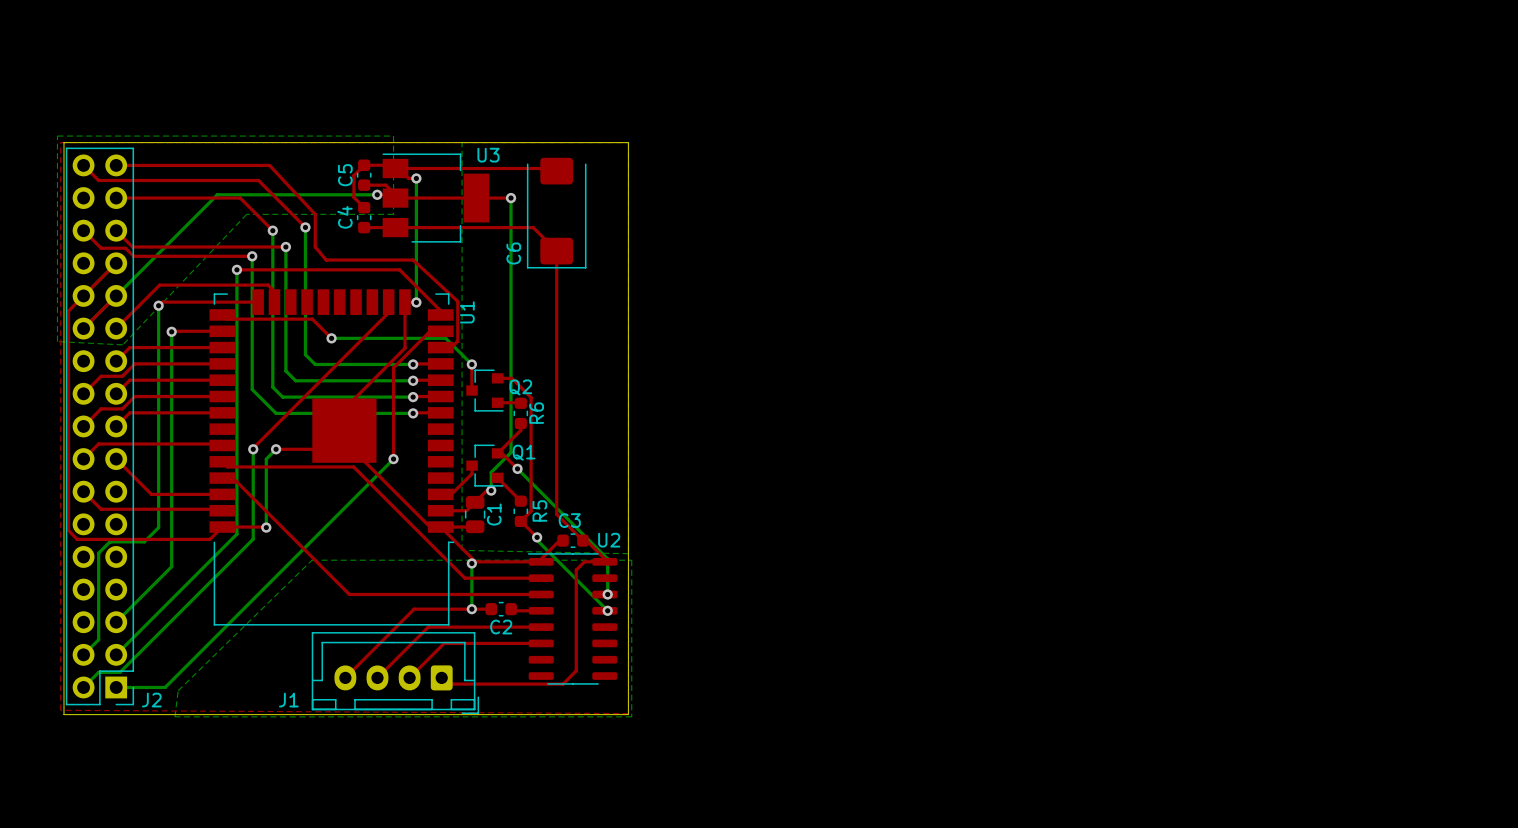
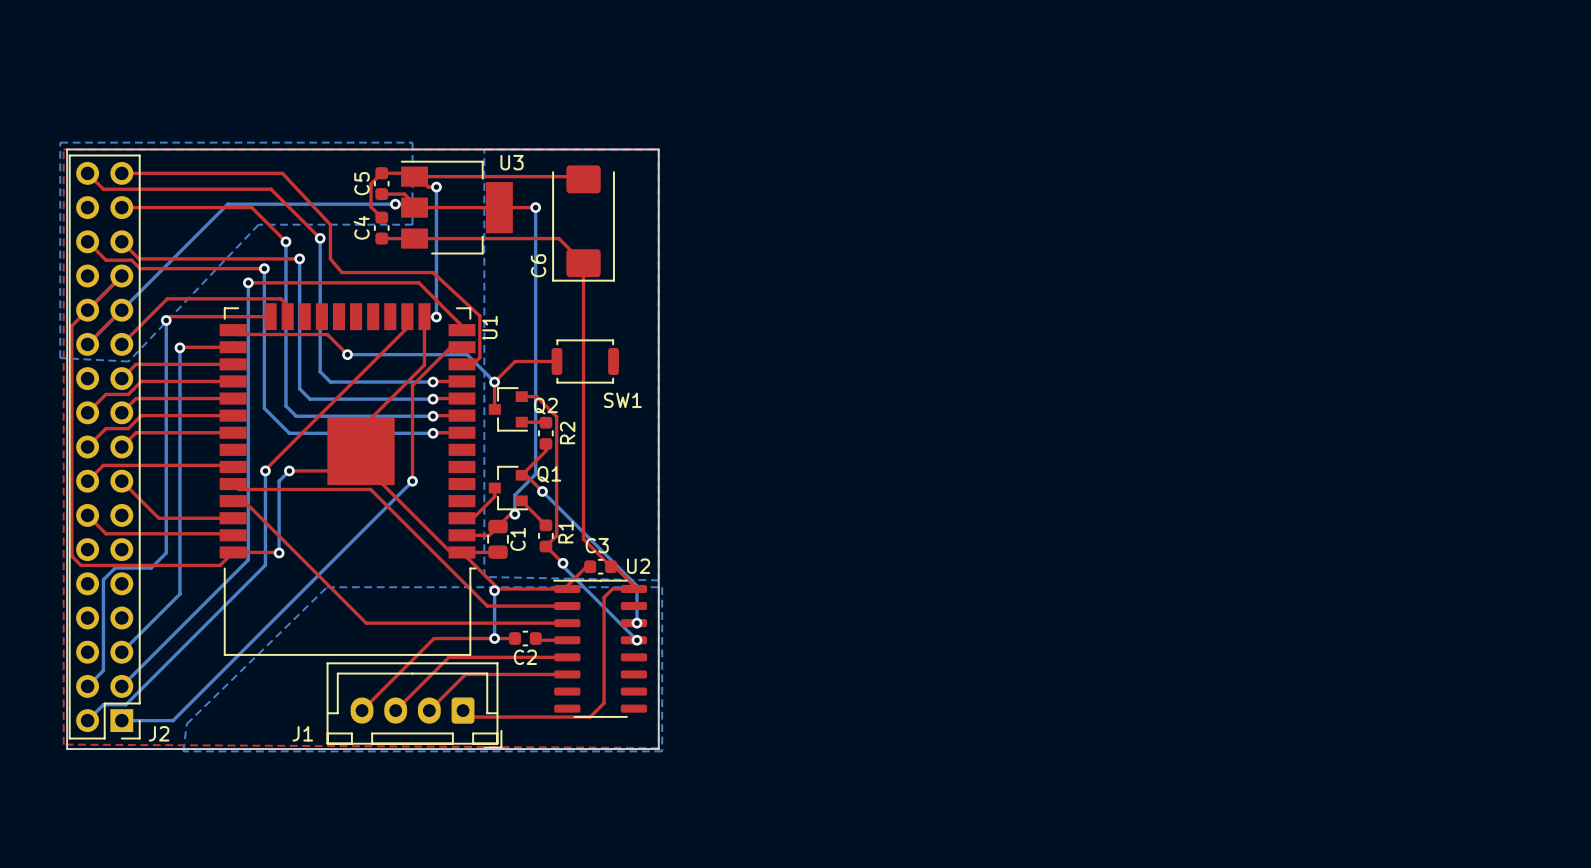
top track: none -> (556, 361) (515, 361) (494, 382)
SW1: none -> (585, 361)
R6 name: R6 (536, 413) -> R2 (567, 433)
R5 name: R5 (539, 510) -> R1 (565, 532)

